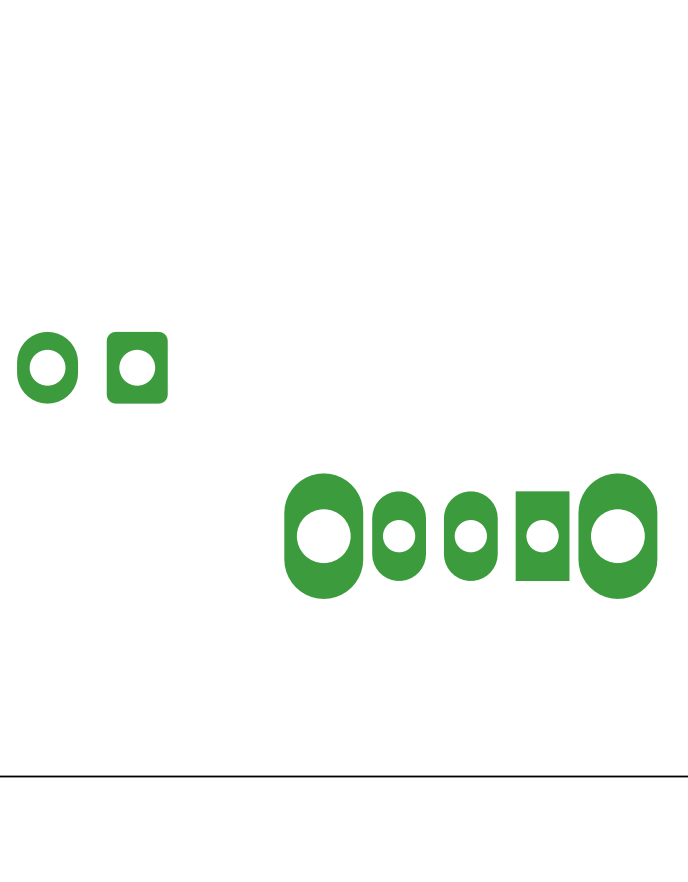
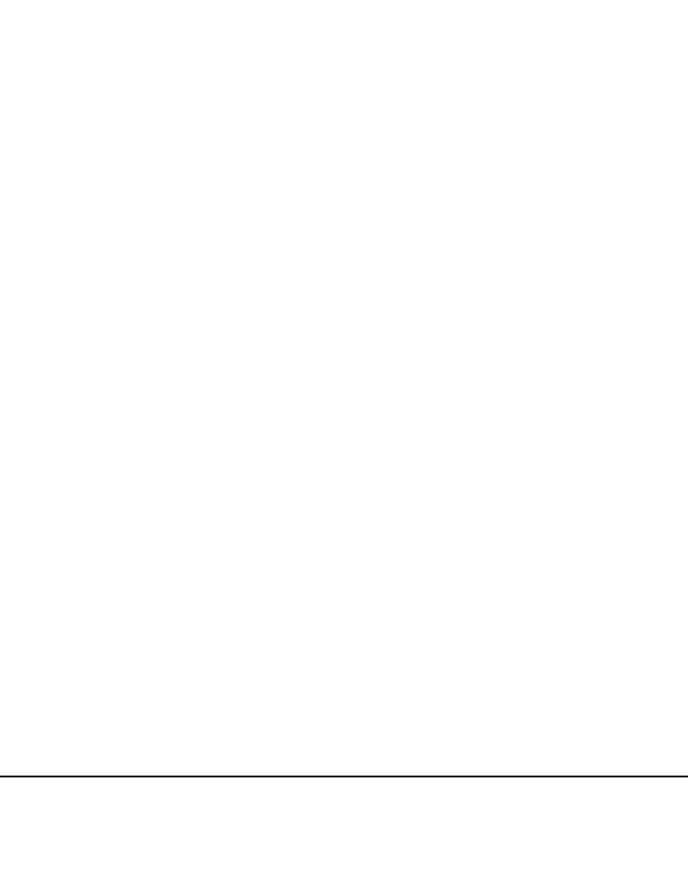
part: (92, 367) -> none
part: (470, 536) -> none

